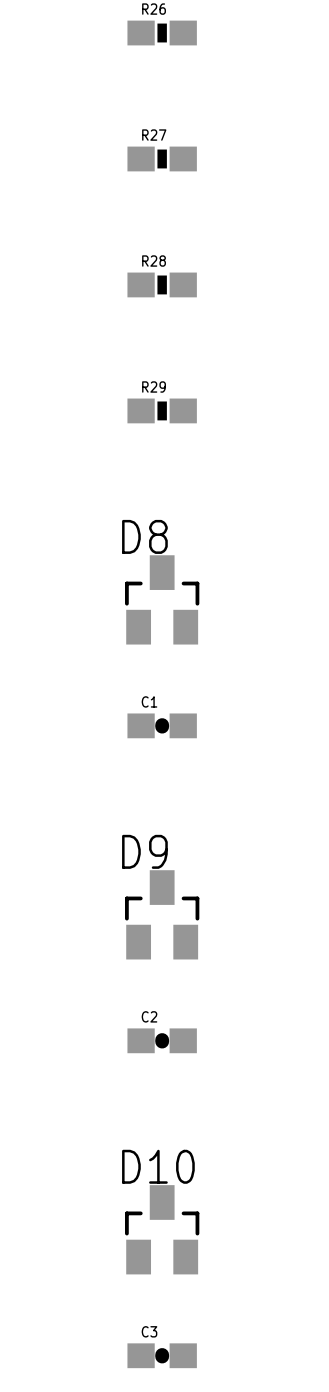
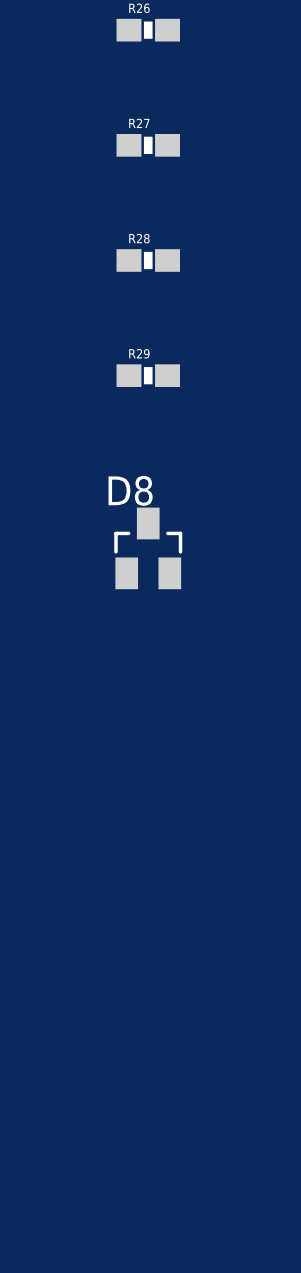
C1: (162, 725) -> none
D9: (162, 914) -> none
C2: (162, 1040) -> none
D10: (162, 1229) -> none
C3: (162, 1355) -> none

